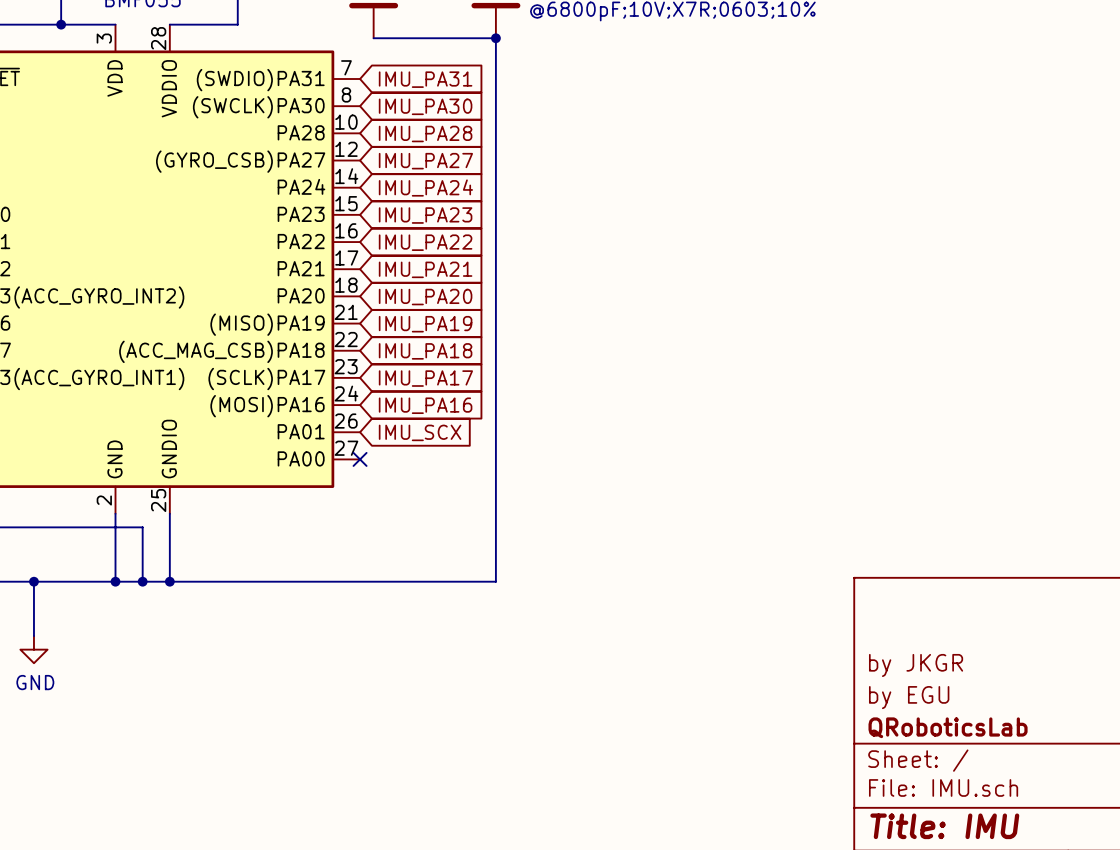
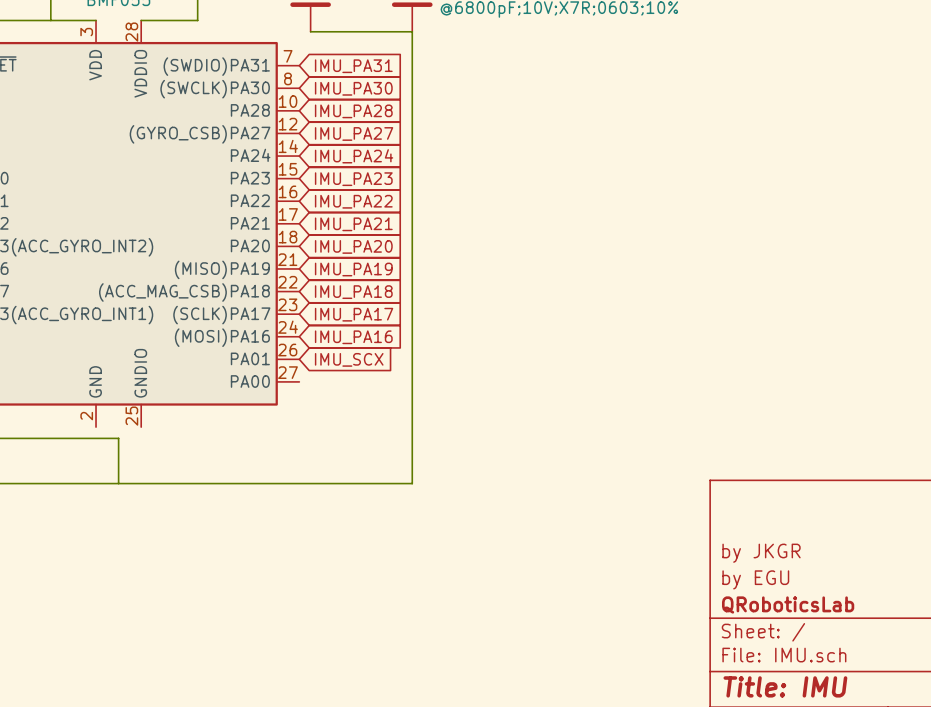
junction: (61, 24) -> none
junction: (495, 38) -> none
no-connect mark: (360, 459) -> none
wire: (115, 513) (115, 581) -> none
wire: (169, 513) (169, 581) -> none
wire: (33, 581) (33, 636) -> none
junction: (33, 581) -> none
junction: (115, 581) -> none
junction: (142, 581) -> none
junction: (169, 581) -> none
power symbol: GND (33, 649) -> none

